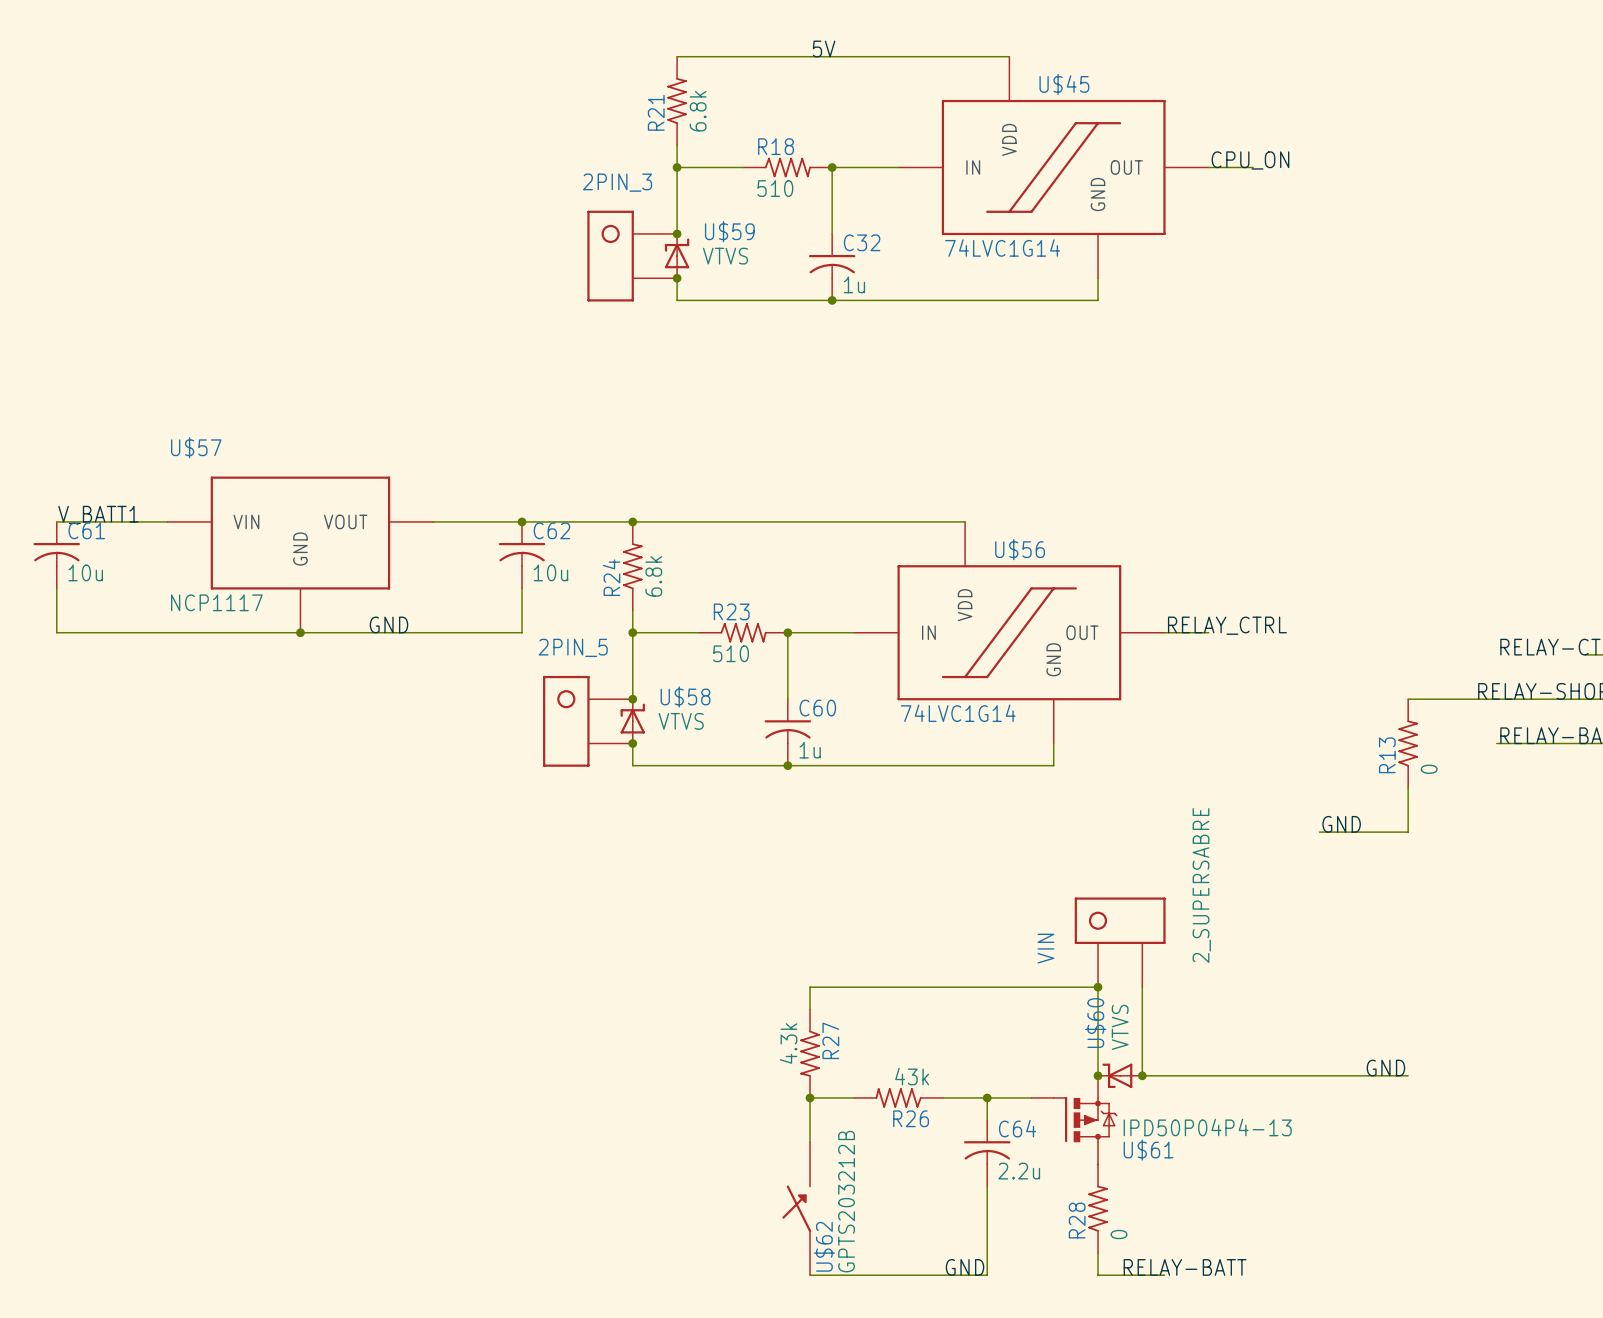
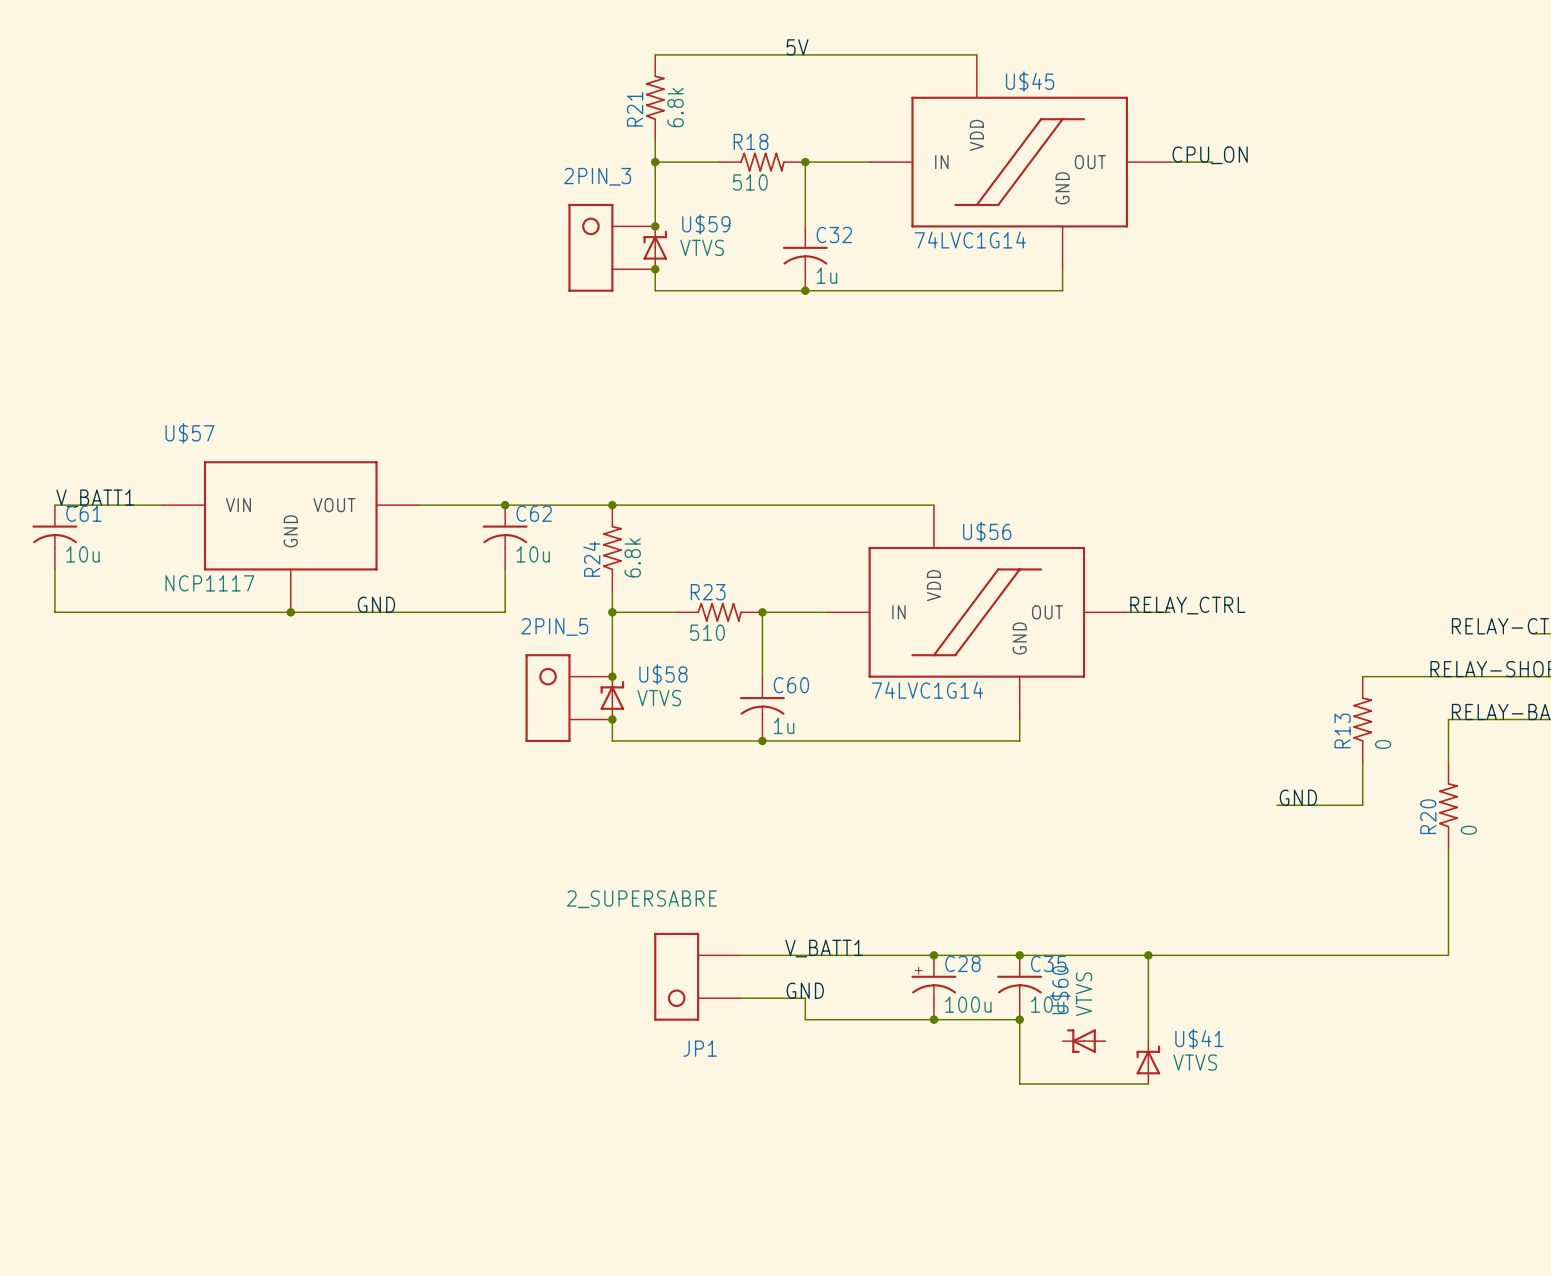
wire: none -> (1448, 719) (1448, 762)
R20: none -> 0 (1448, 805)
VIN: 2_SUPERSABRE (1120, 942) -> none
label: none -> V_BATT1 (824, 948)
wire: (810, 987) (810, 1009) -> (783, 955) (741, 955)
junction: none -> (933, 955)
junction: none -> (1019, 955)
wire: (1098, 987) (1098, 1075) -> (1062, 955) (1448, 955) (1448, 848)
junction: (1098, 987) -> none
wire: (1142, 987) (1142, 1075) (1408, 1075) -> none
wire: none -> (1148, 955) (1148, 1041)
junction: none -> (1148, 955)
JP1: none -> 2_SUPERSABRE (697, 976)
C28: none -> 100u (933, 987)
C35: none -> 10u (1019, 987)
label: none -> GND (805, 990)
wire: none -> (741, 998) (805, 998) (805, 1019) (1019, 1019) (1019, 1083) (1148, 1083)
R27: 4.3k (810, 1053) -> none
junction: none -> (933, 1019)
junction: none -> (1019, 1019)
label: GND (1385, 1068) -> none
junction: (1098, 1075) -> none
junction: (1142, 1075) -> none
junction: (810, 1097) -> none
wire: (854, 1097) (810, 1097) (810, 1142) -> none
R26: 43k (898, 1097) -> none
wire: (942, 1097) (1031, 1097) -> none
wire: (987, 1097) (987, 1120) -> none
junction: (987, 1097) -> none
U$41: none -> VTVS (1148, 1062)
U$61: IPD50P04P4-13 (1074, 1120) -> none
C64: 2.2u (987, 1153) -> none
wire: (987, 1186) (987, 1275) (810, 1275) -> none
U$62: GPTS203212B (796, 1208) -> none
R28: 0 (1098, 1208) -> none
wire: (1098, 1253) (1098, 1275) (1164, 1275) -> none
label: GND (965, 1267) -> none
label: RELAY-BATT (1185, 1267) -> none

